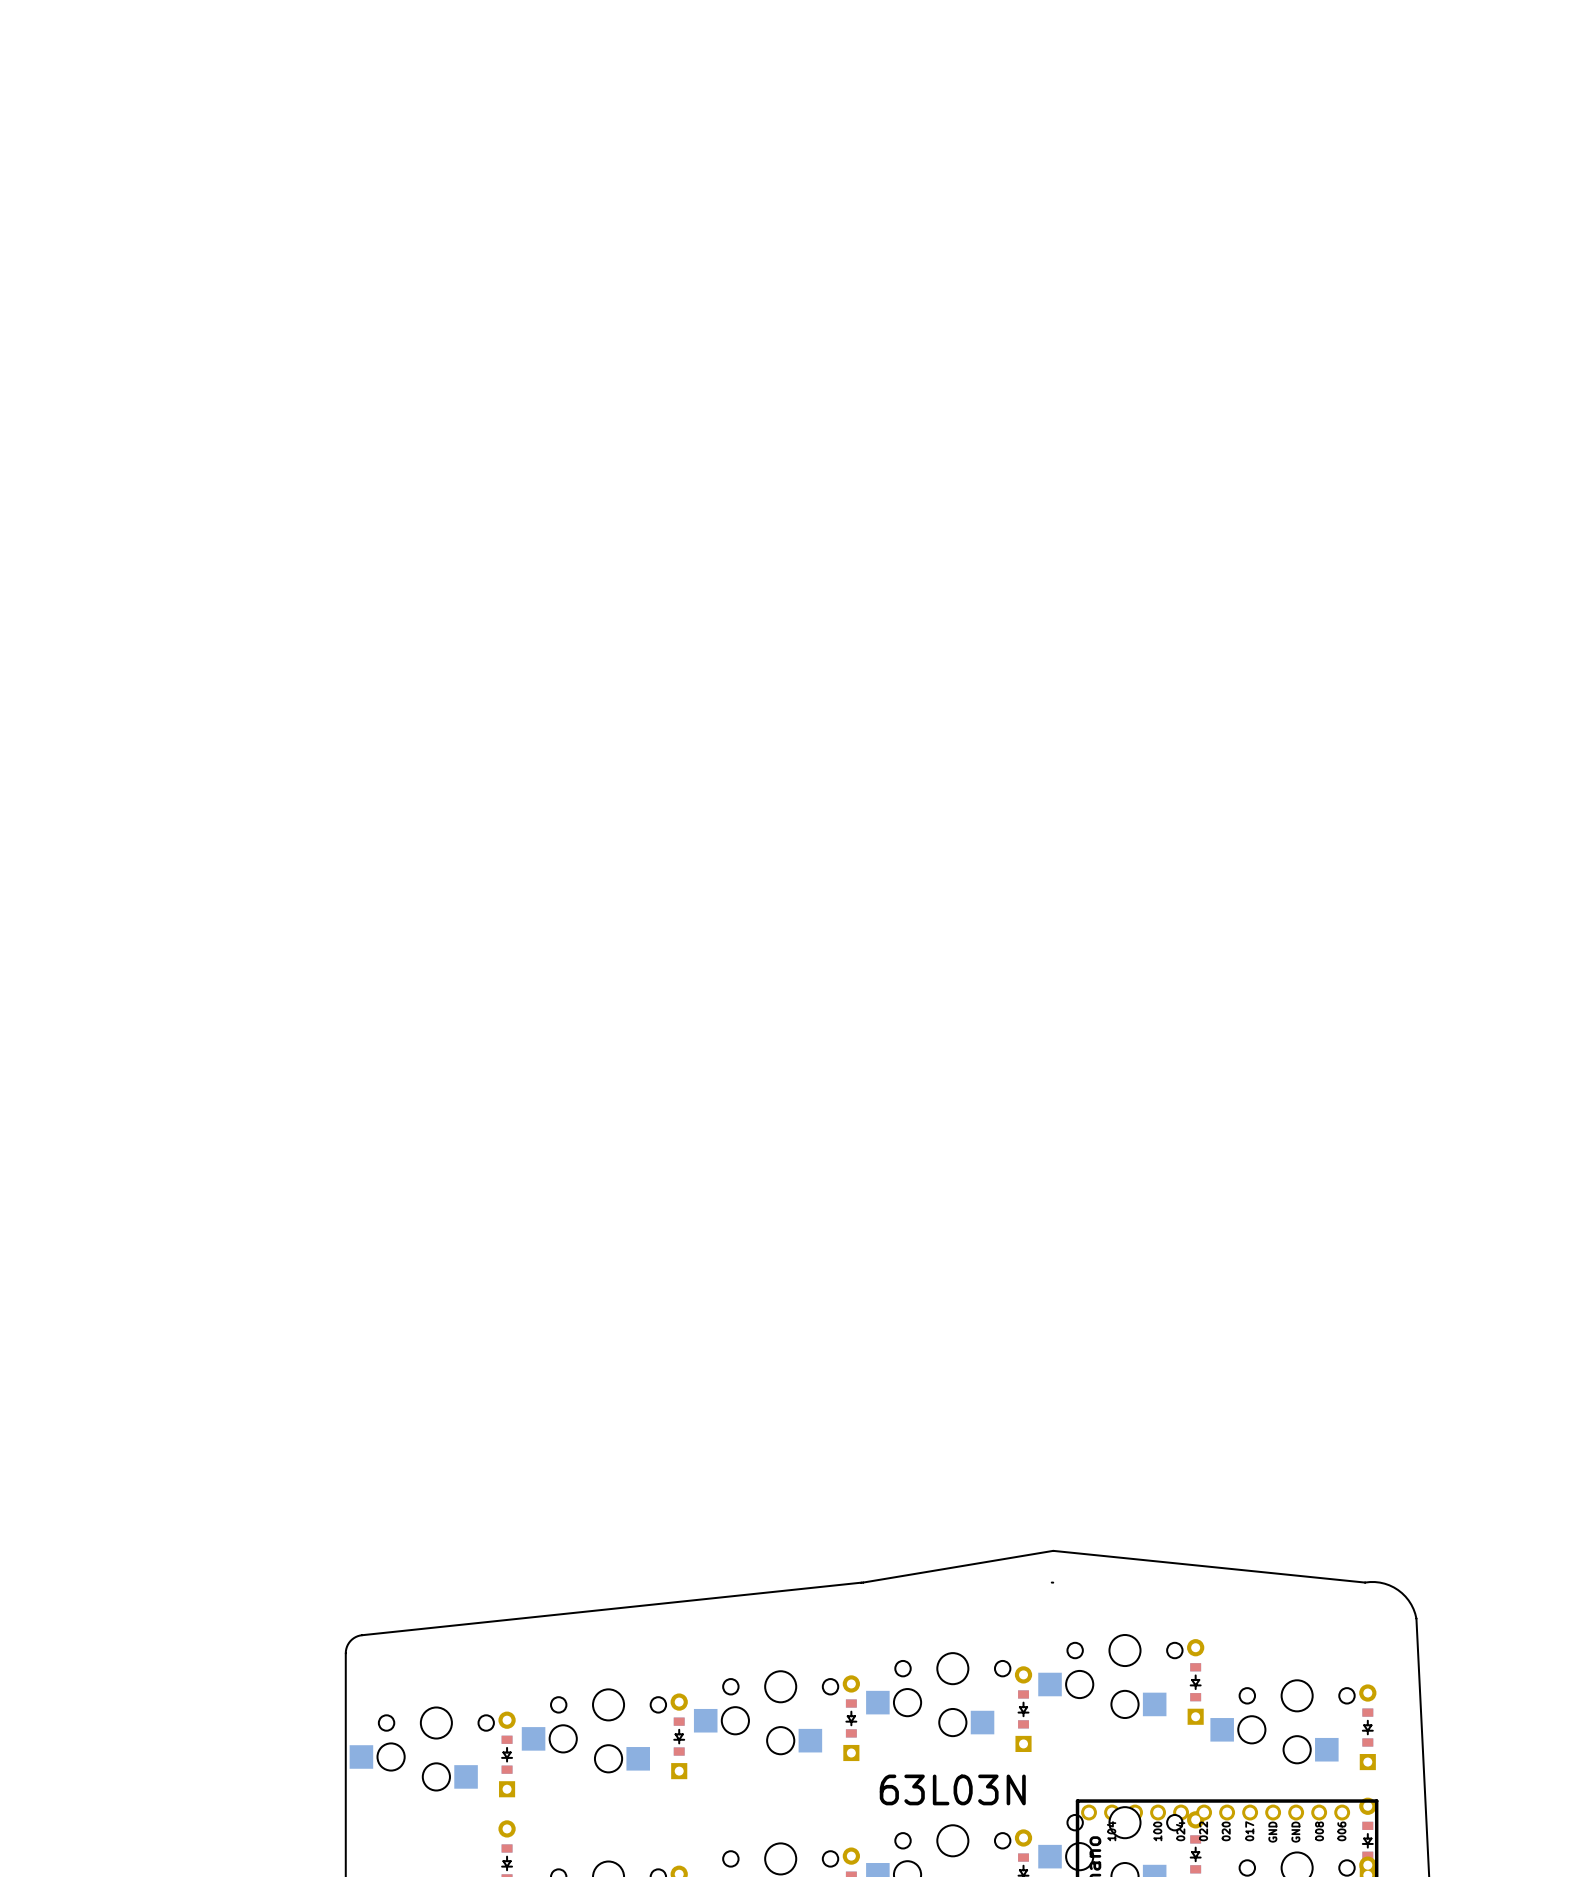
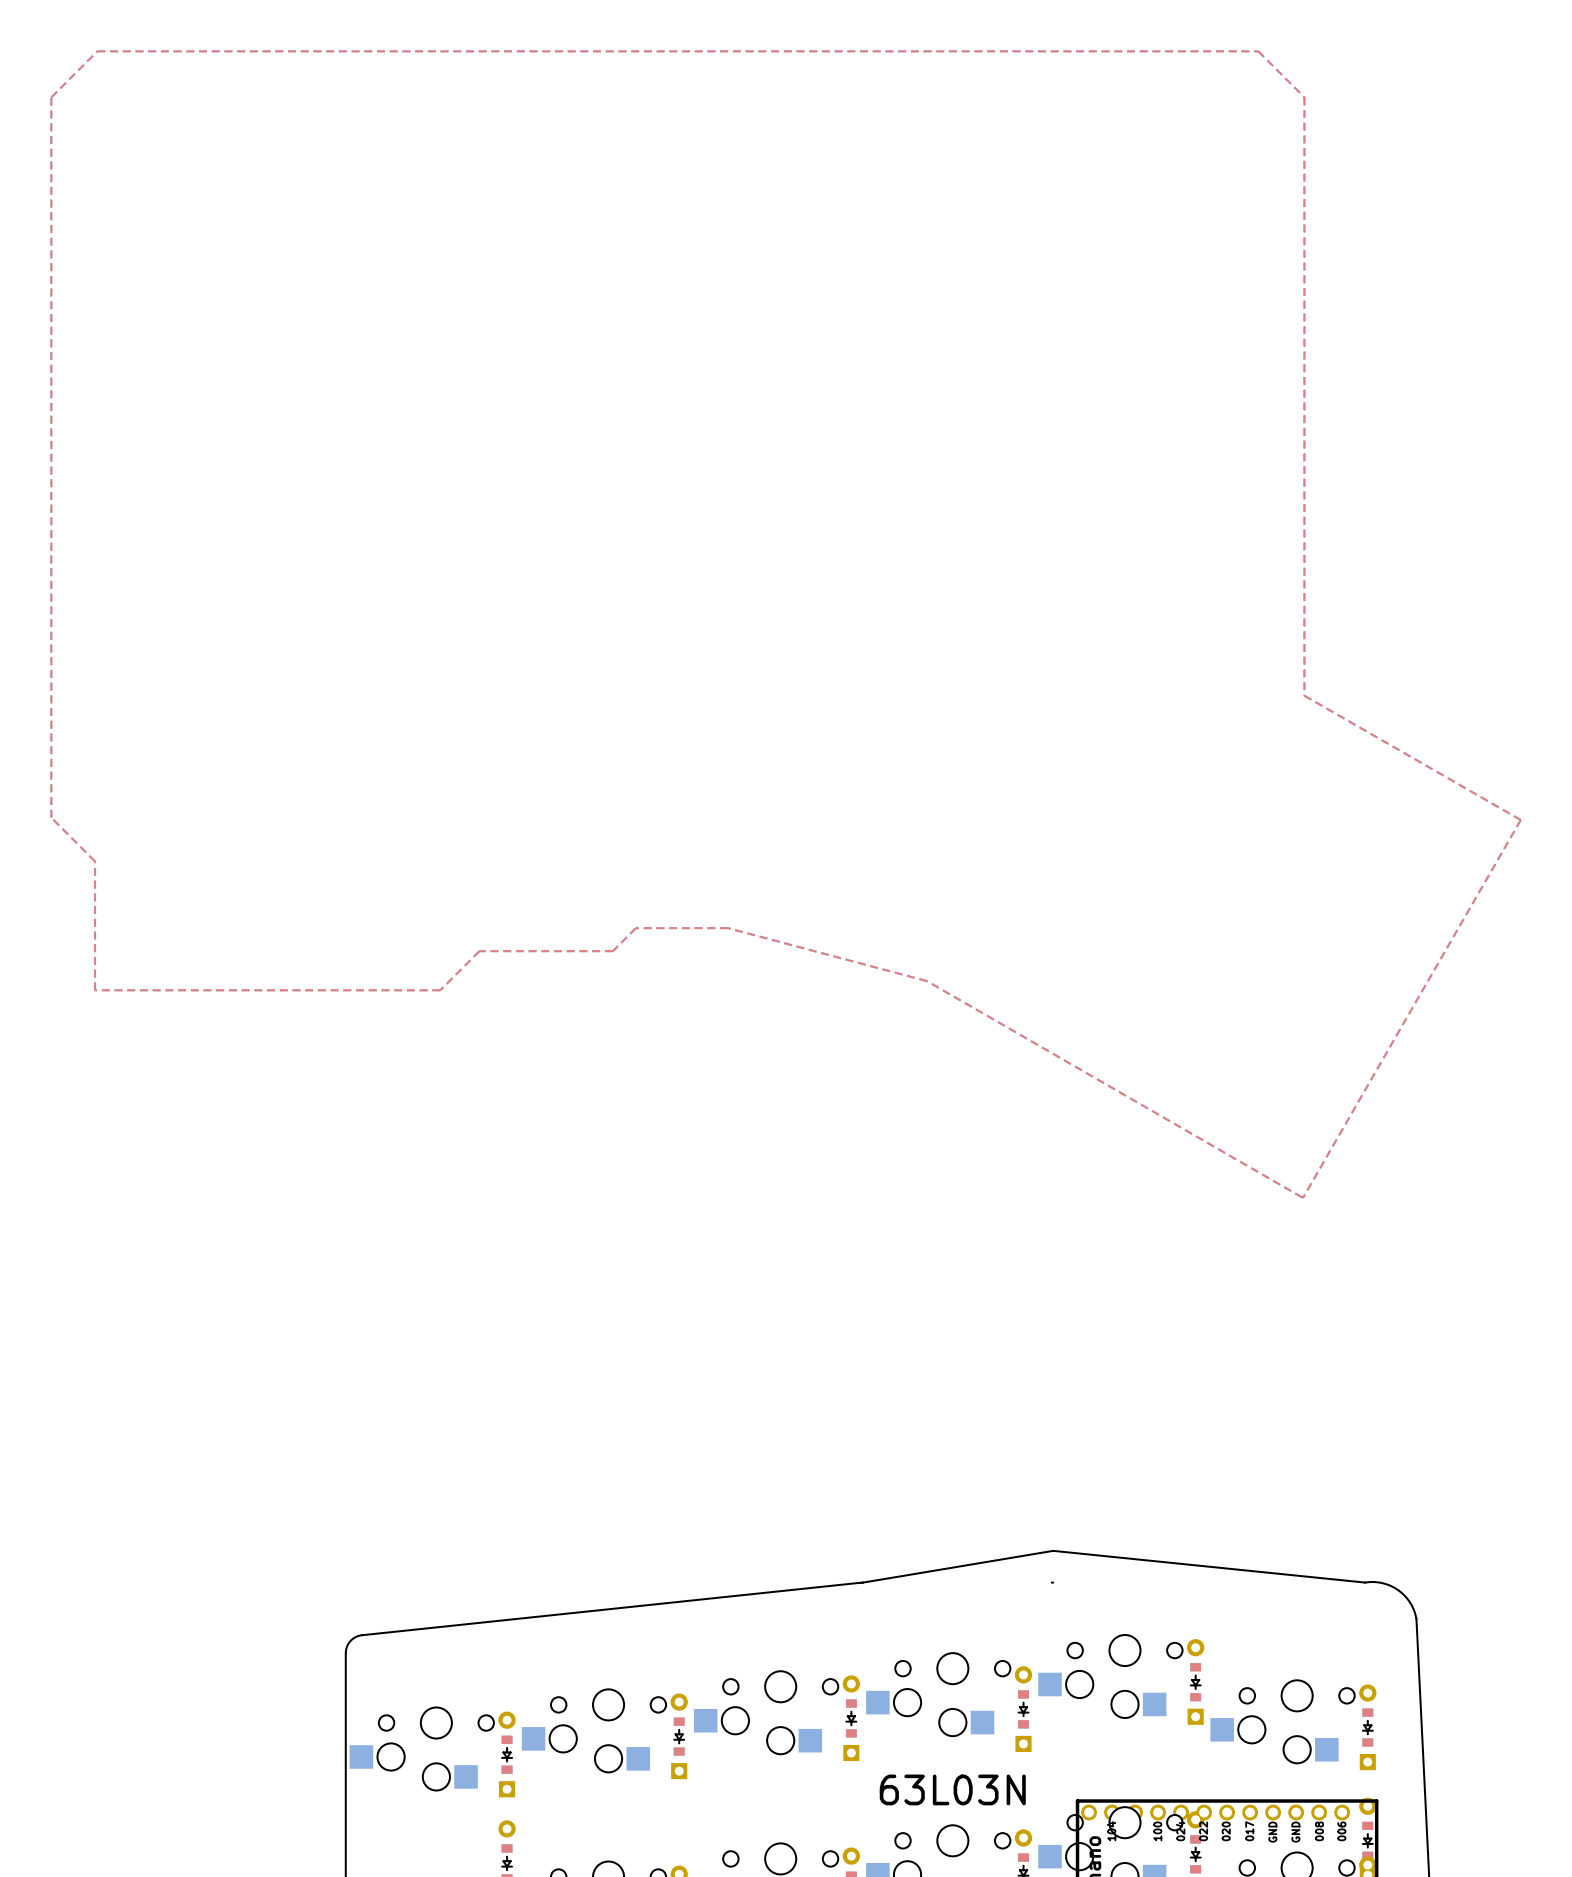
top zone outline: none -> (97, 51) (51, 97) (51, 817) (95, 861) (95, 990) (440, 990) (479, 951) (612, 951) (635, 928) (727, 928) (927, 981) (1303, 1197) (1520, 819) (1304, 695) (1304, 97) (1258, 51) (97, 51)

